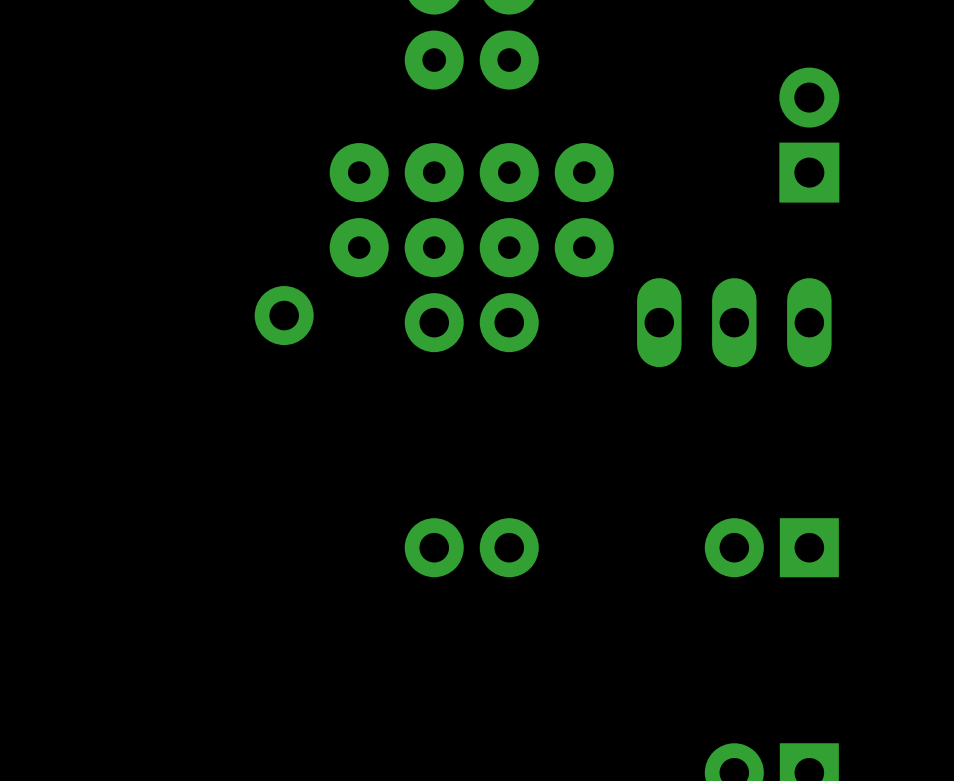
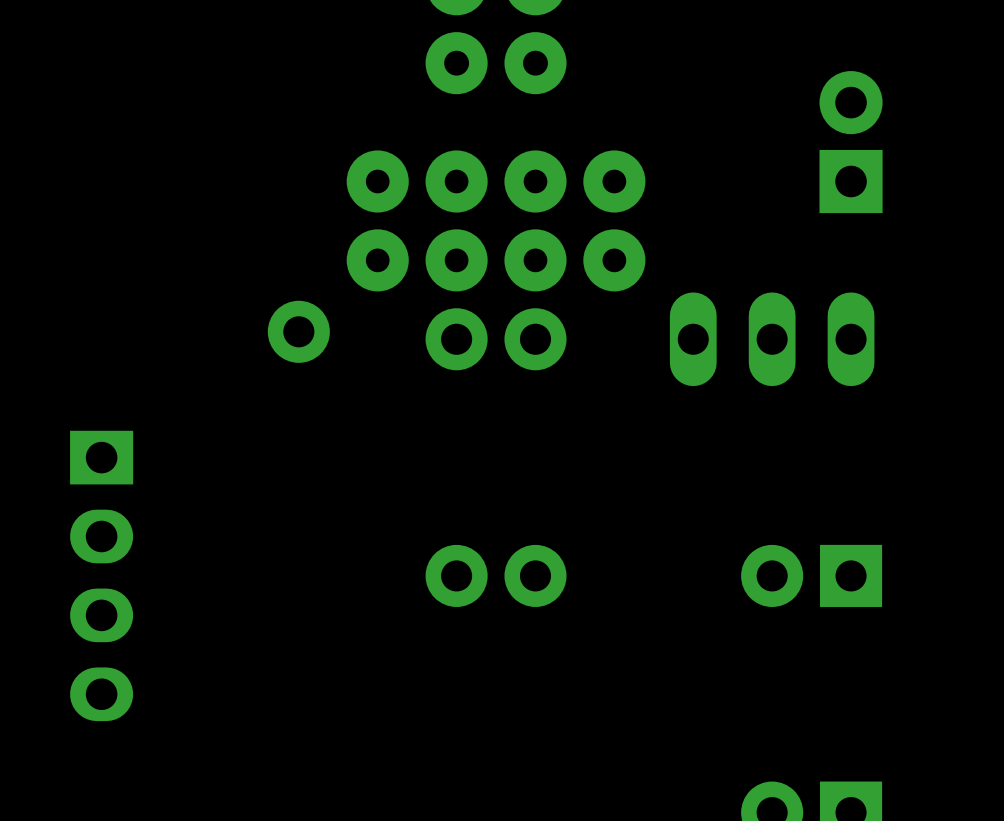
part: none -> (101, 575)

